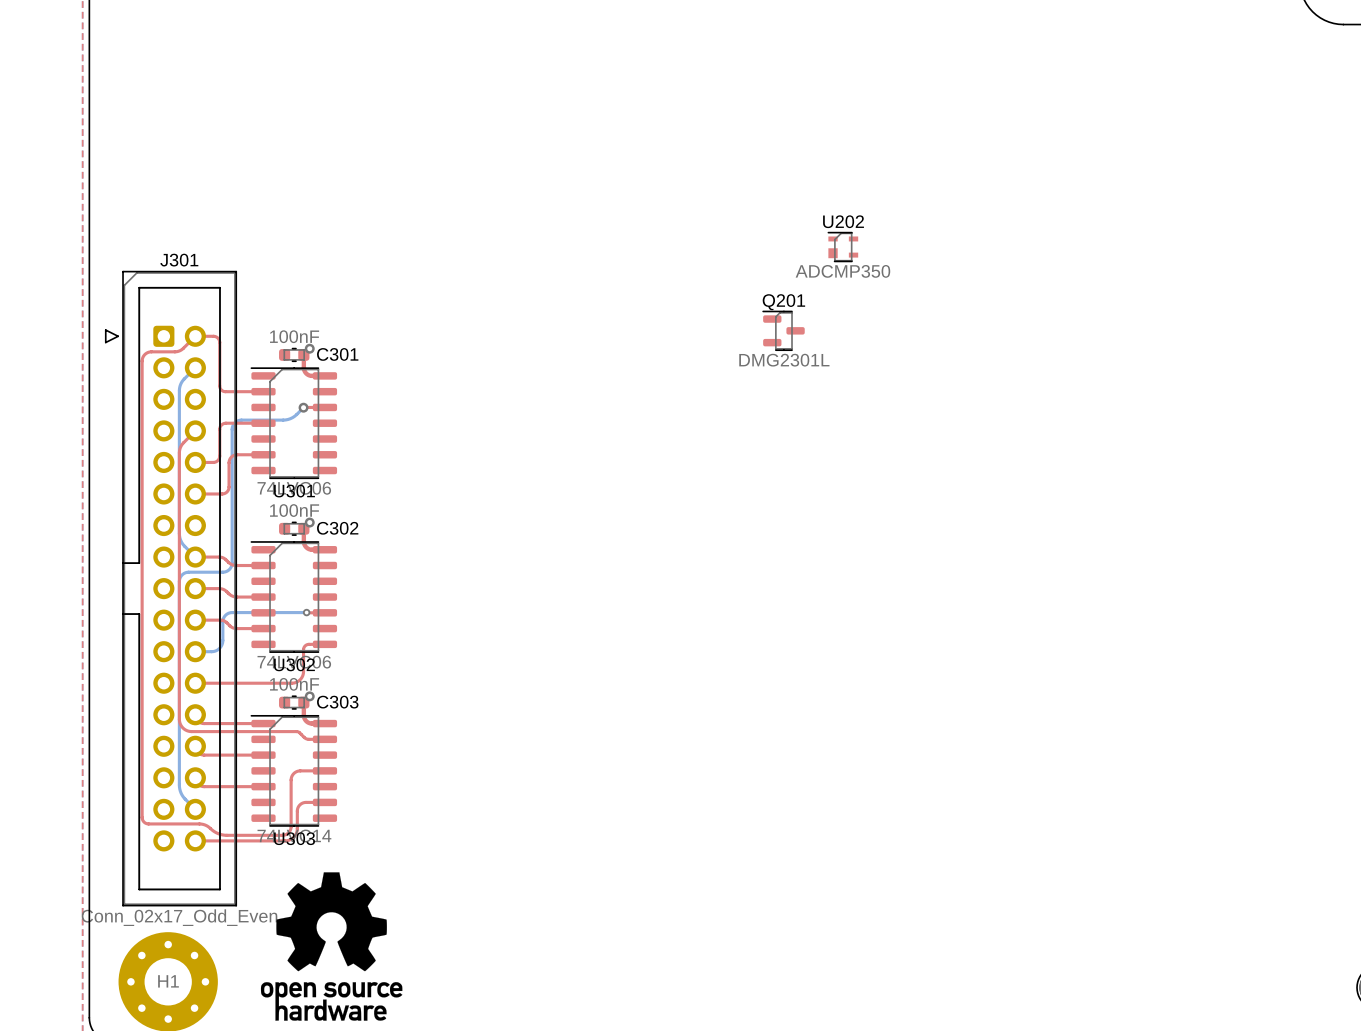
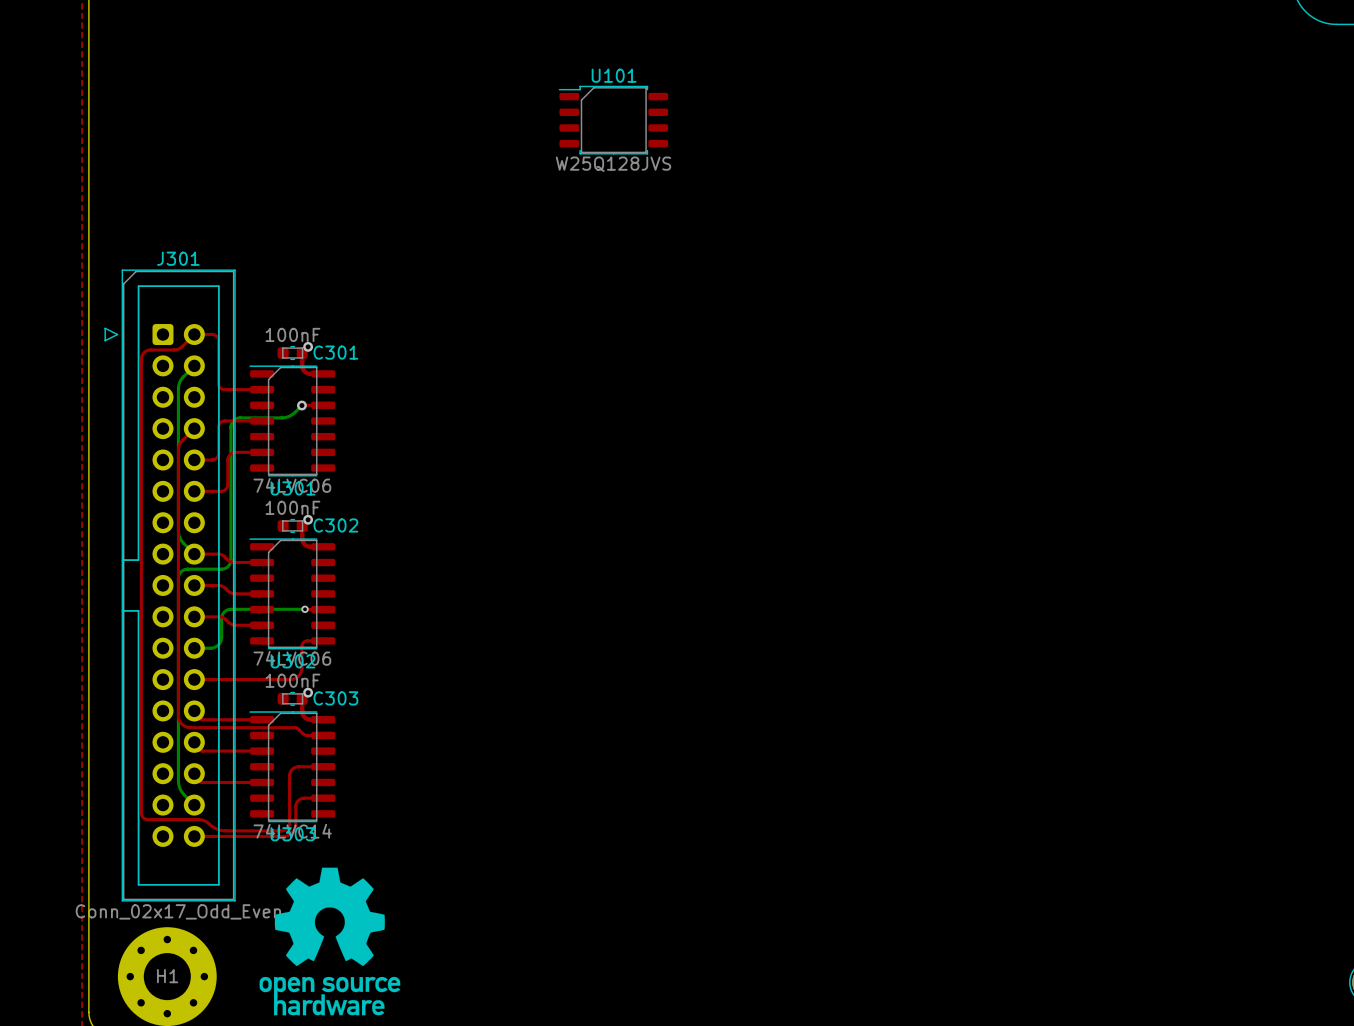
U101: none -> W25Q128JVS (613, 120)
U202: ADCMP350 (842, 247) -> none
Q201: DMG2301L (783, 330) -> none

